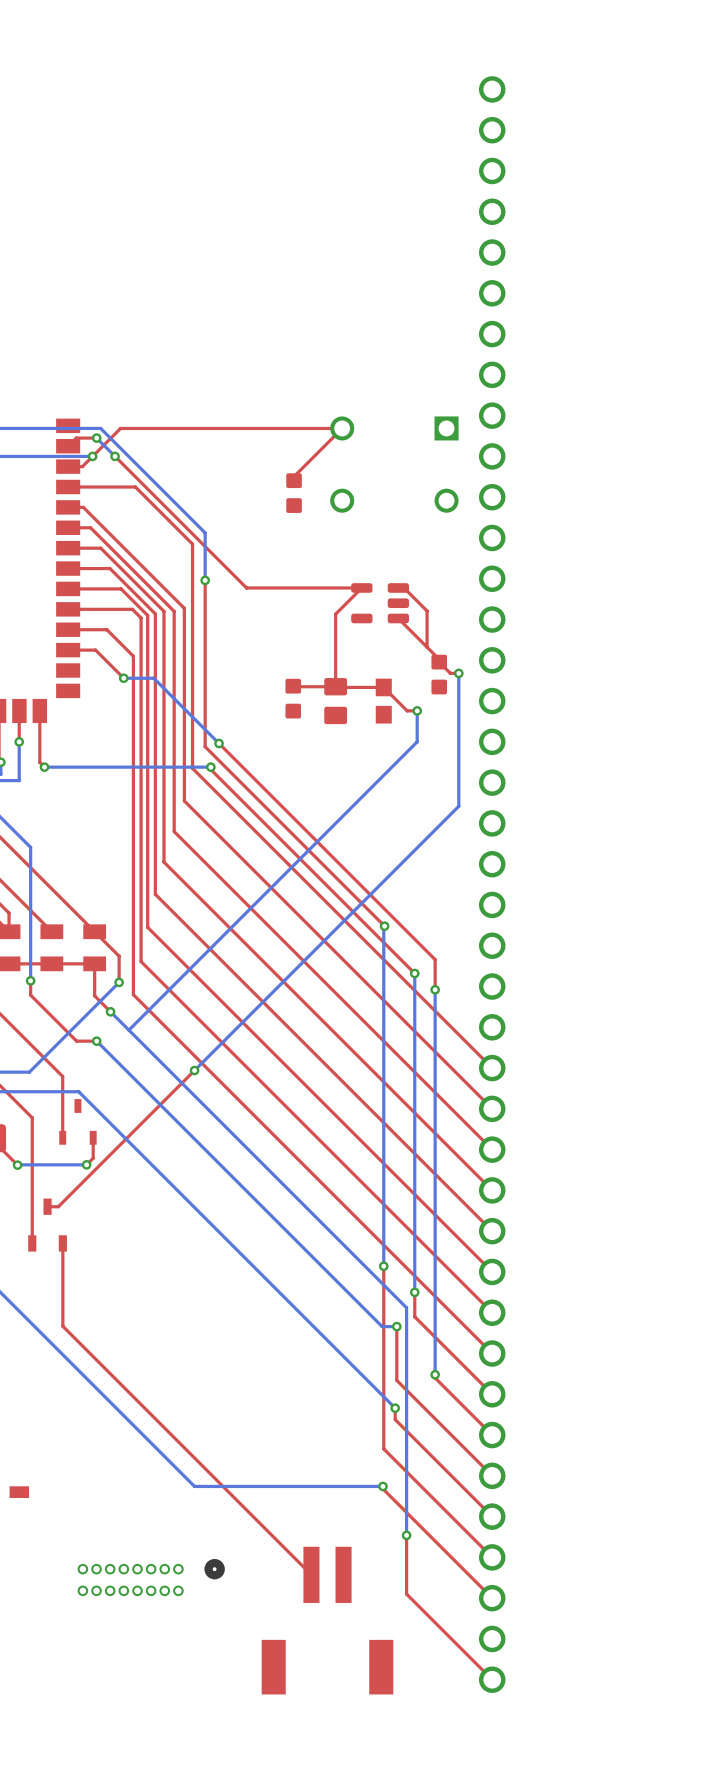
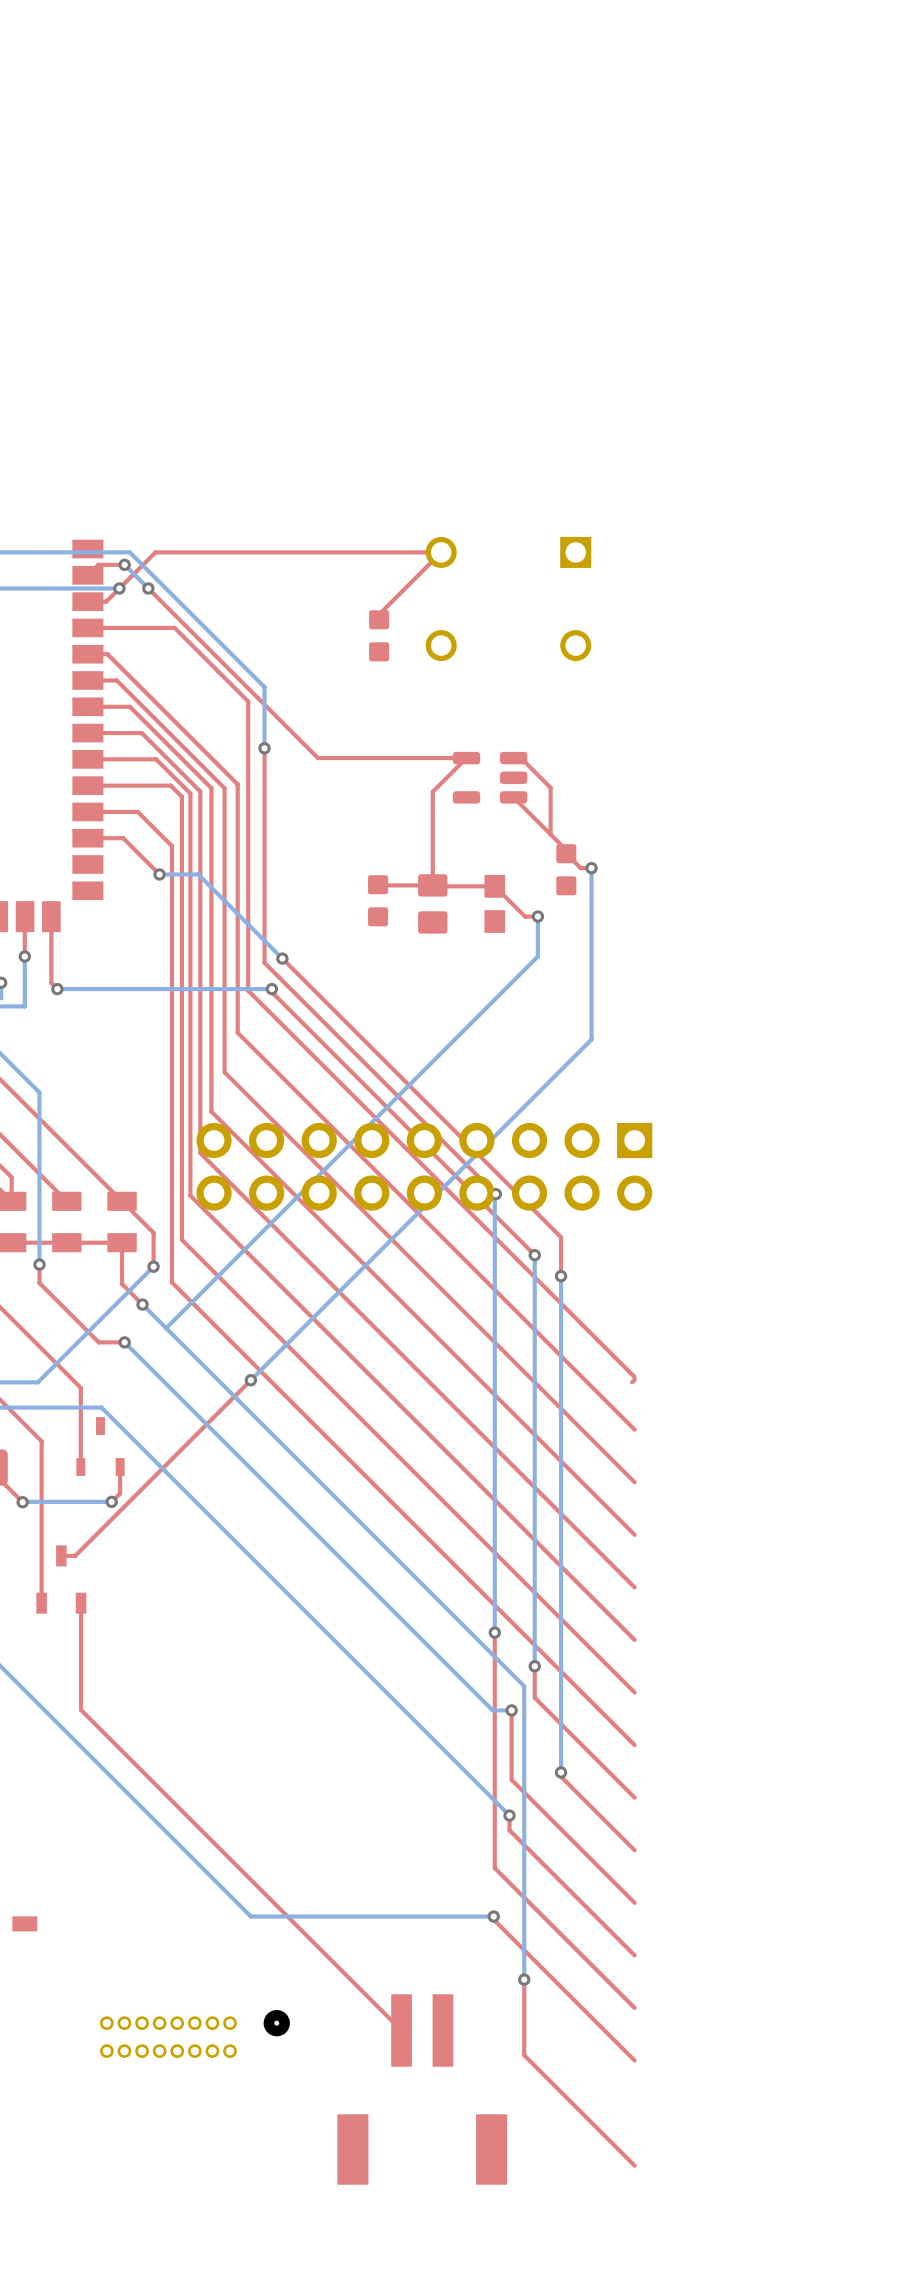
part: (492, 884) -> none
part: none -> (424, 1166)

